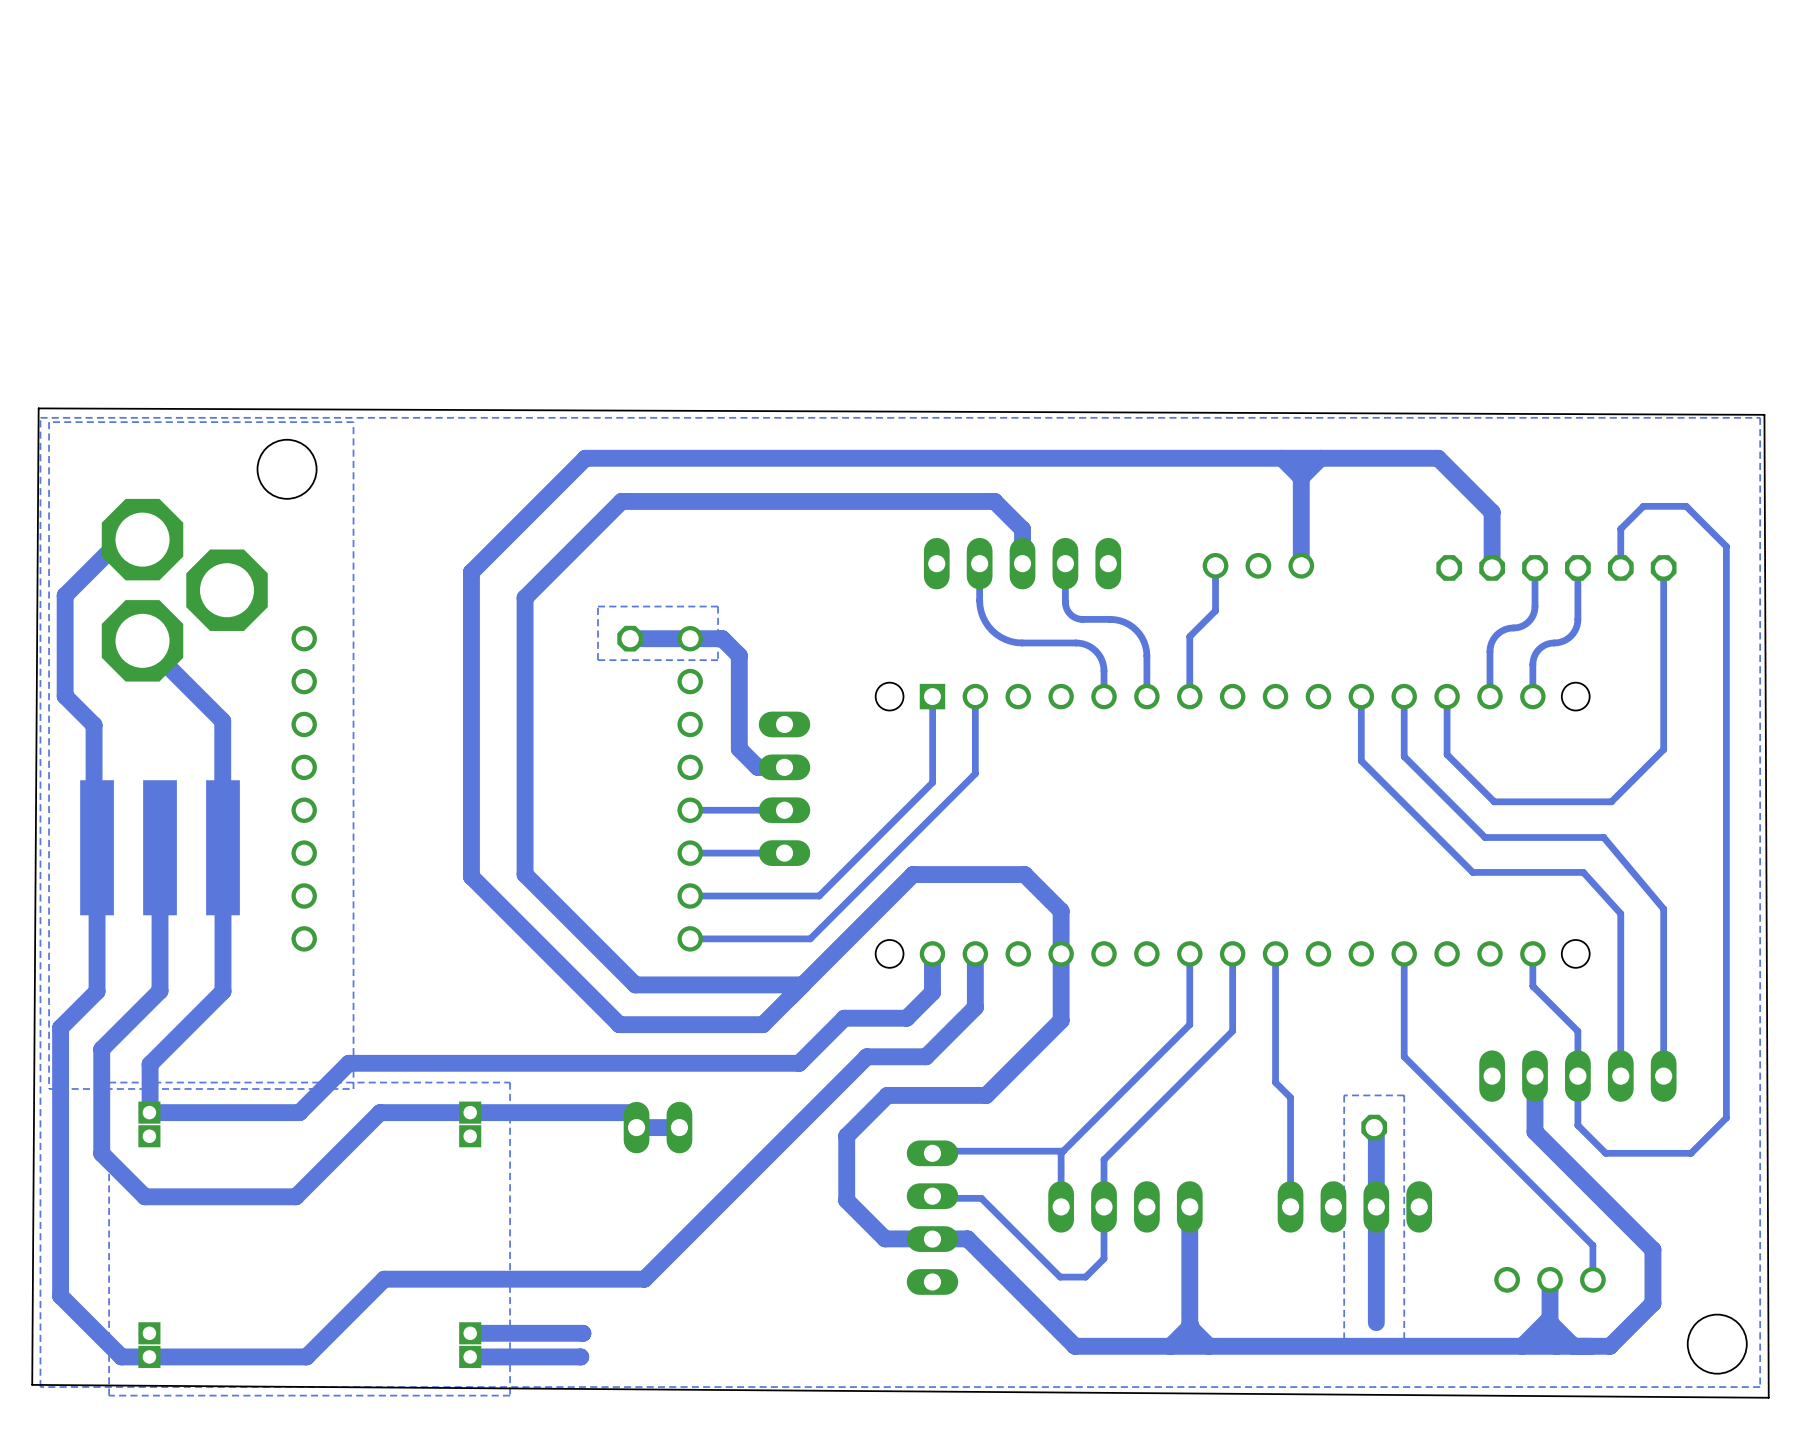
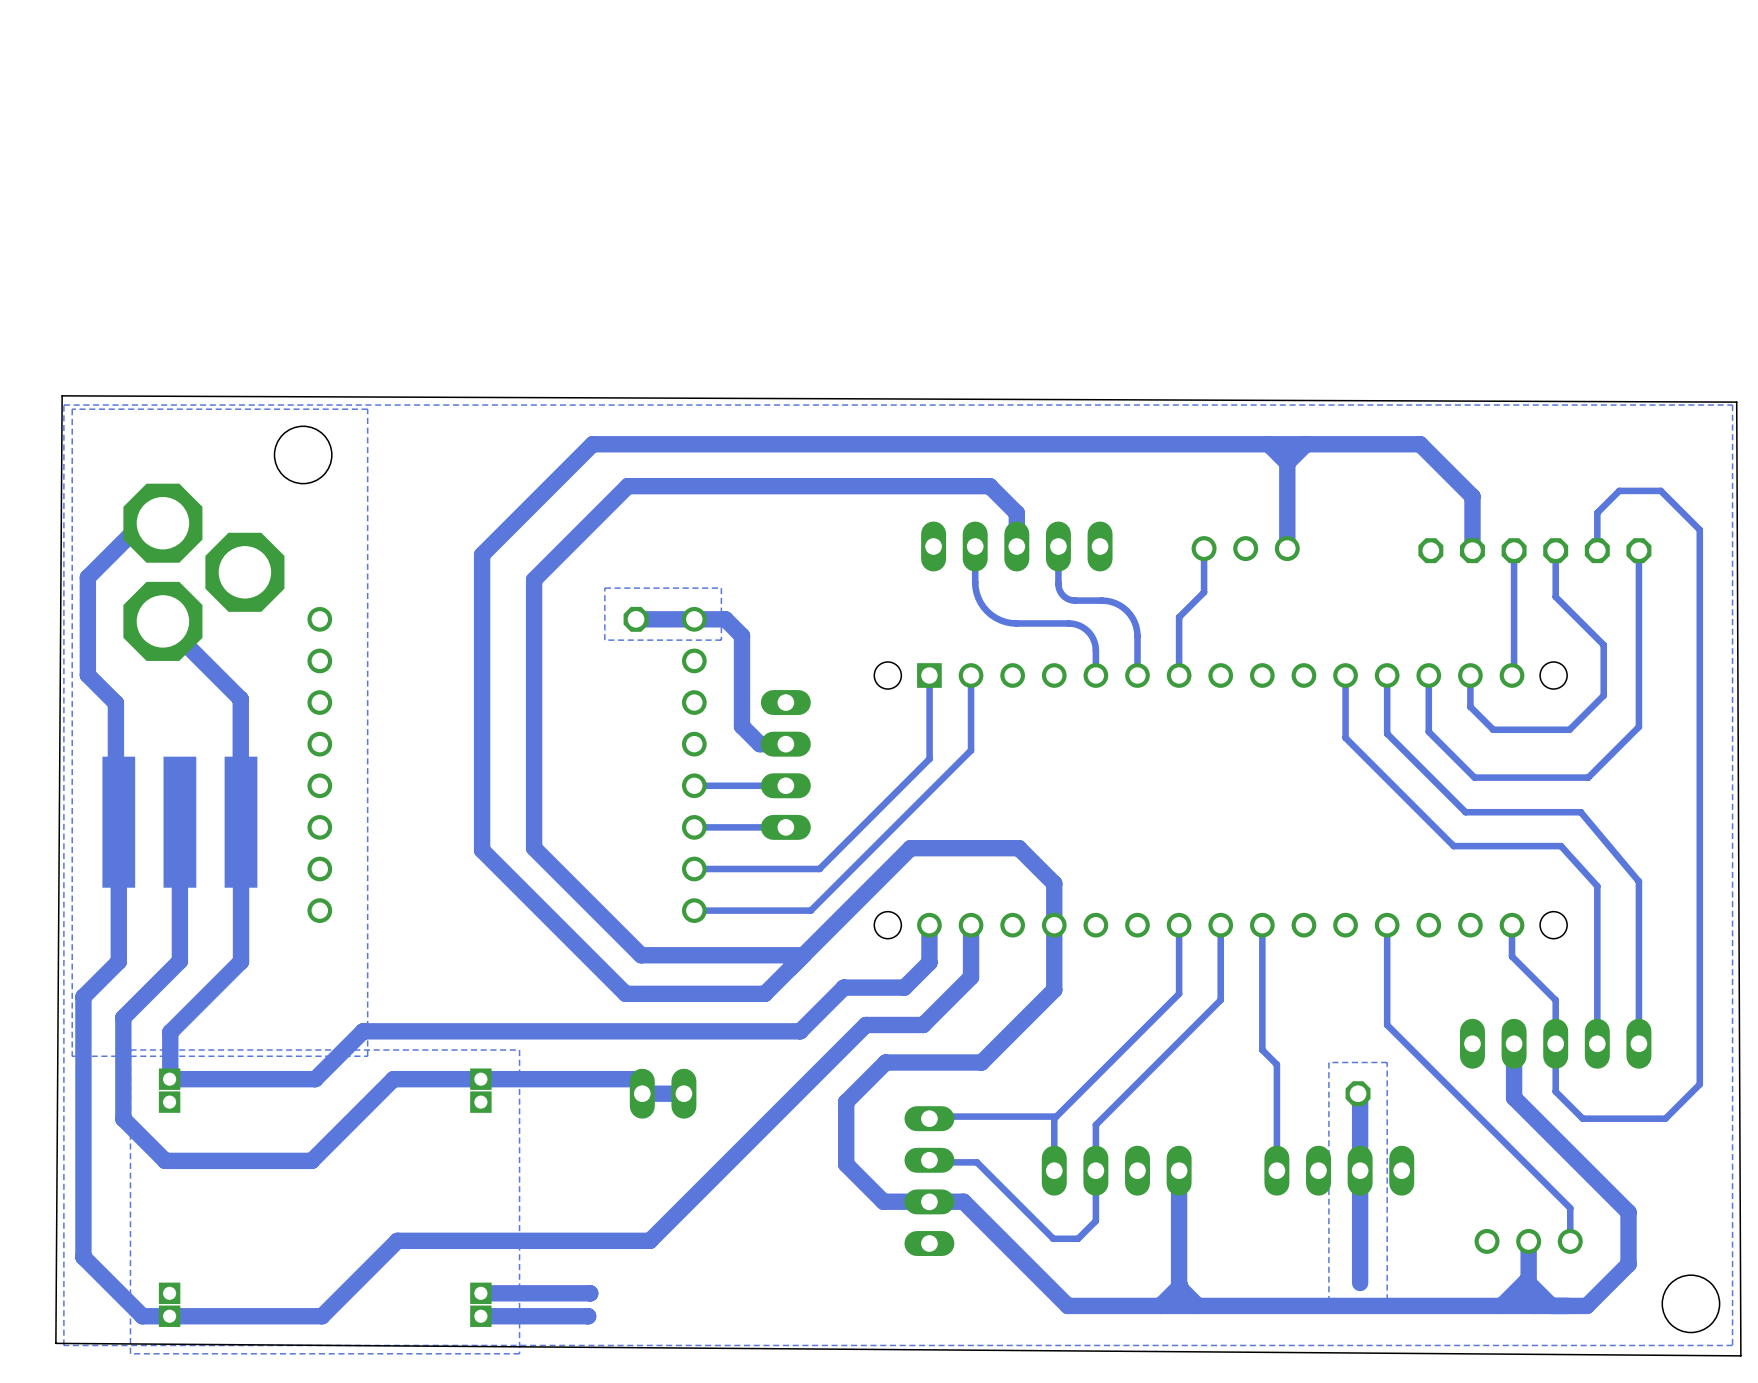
bottom track: (1535, 606) (1533, 614) (1526, 623) (1519, 627) (1504, 629) (1493, 639) (1489, 651) (1489, 696) -> (1514, 588) (1514, 673) (1512, 675)
bottom track: (1577, 615) (1577, 625) (1570, 636) (1563, 641) (1543, 645) (1535, 653) (1533, 661) (1532, 696) -> (1555, 596) (1603, 645) (1603, 695) (1569, 729) (1493, 729) (1470, 706) (1470, 675)

